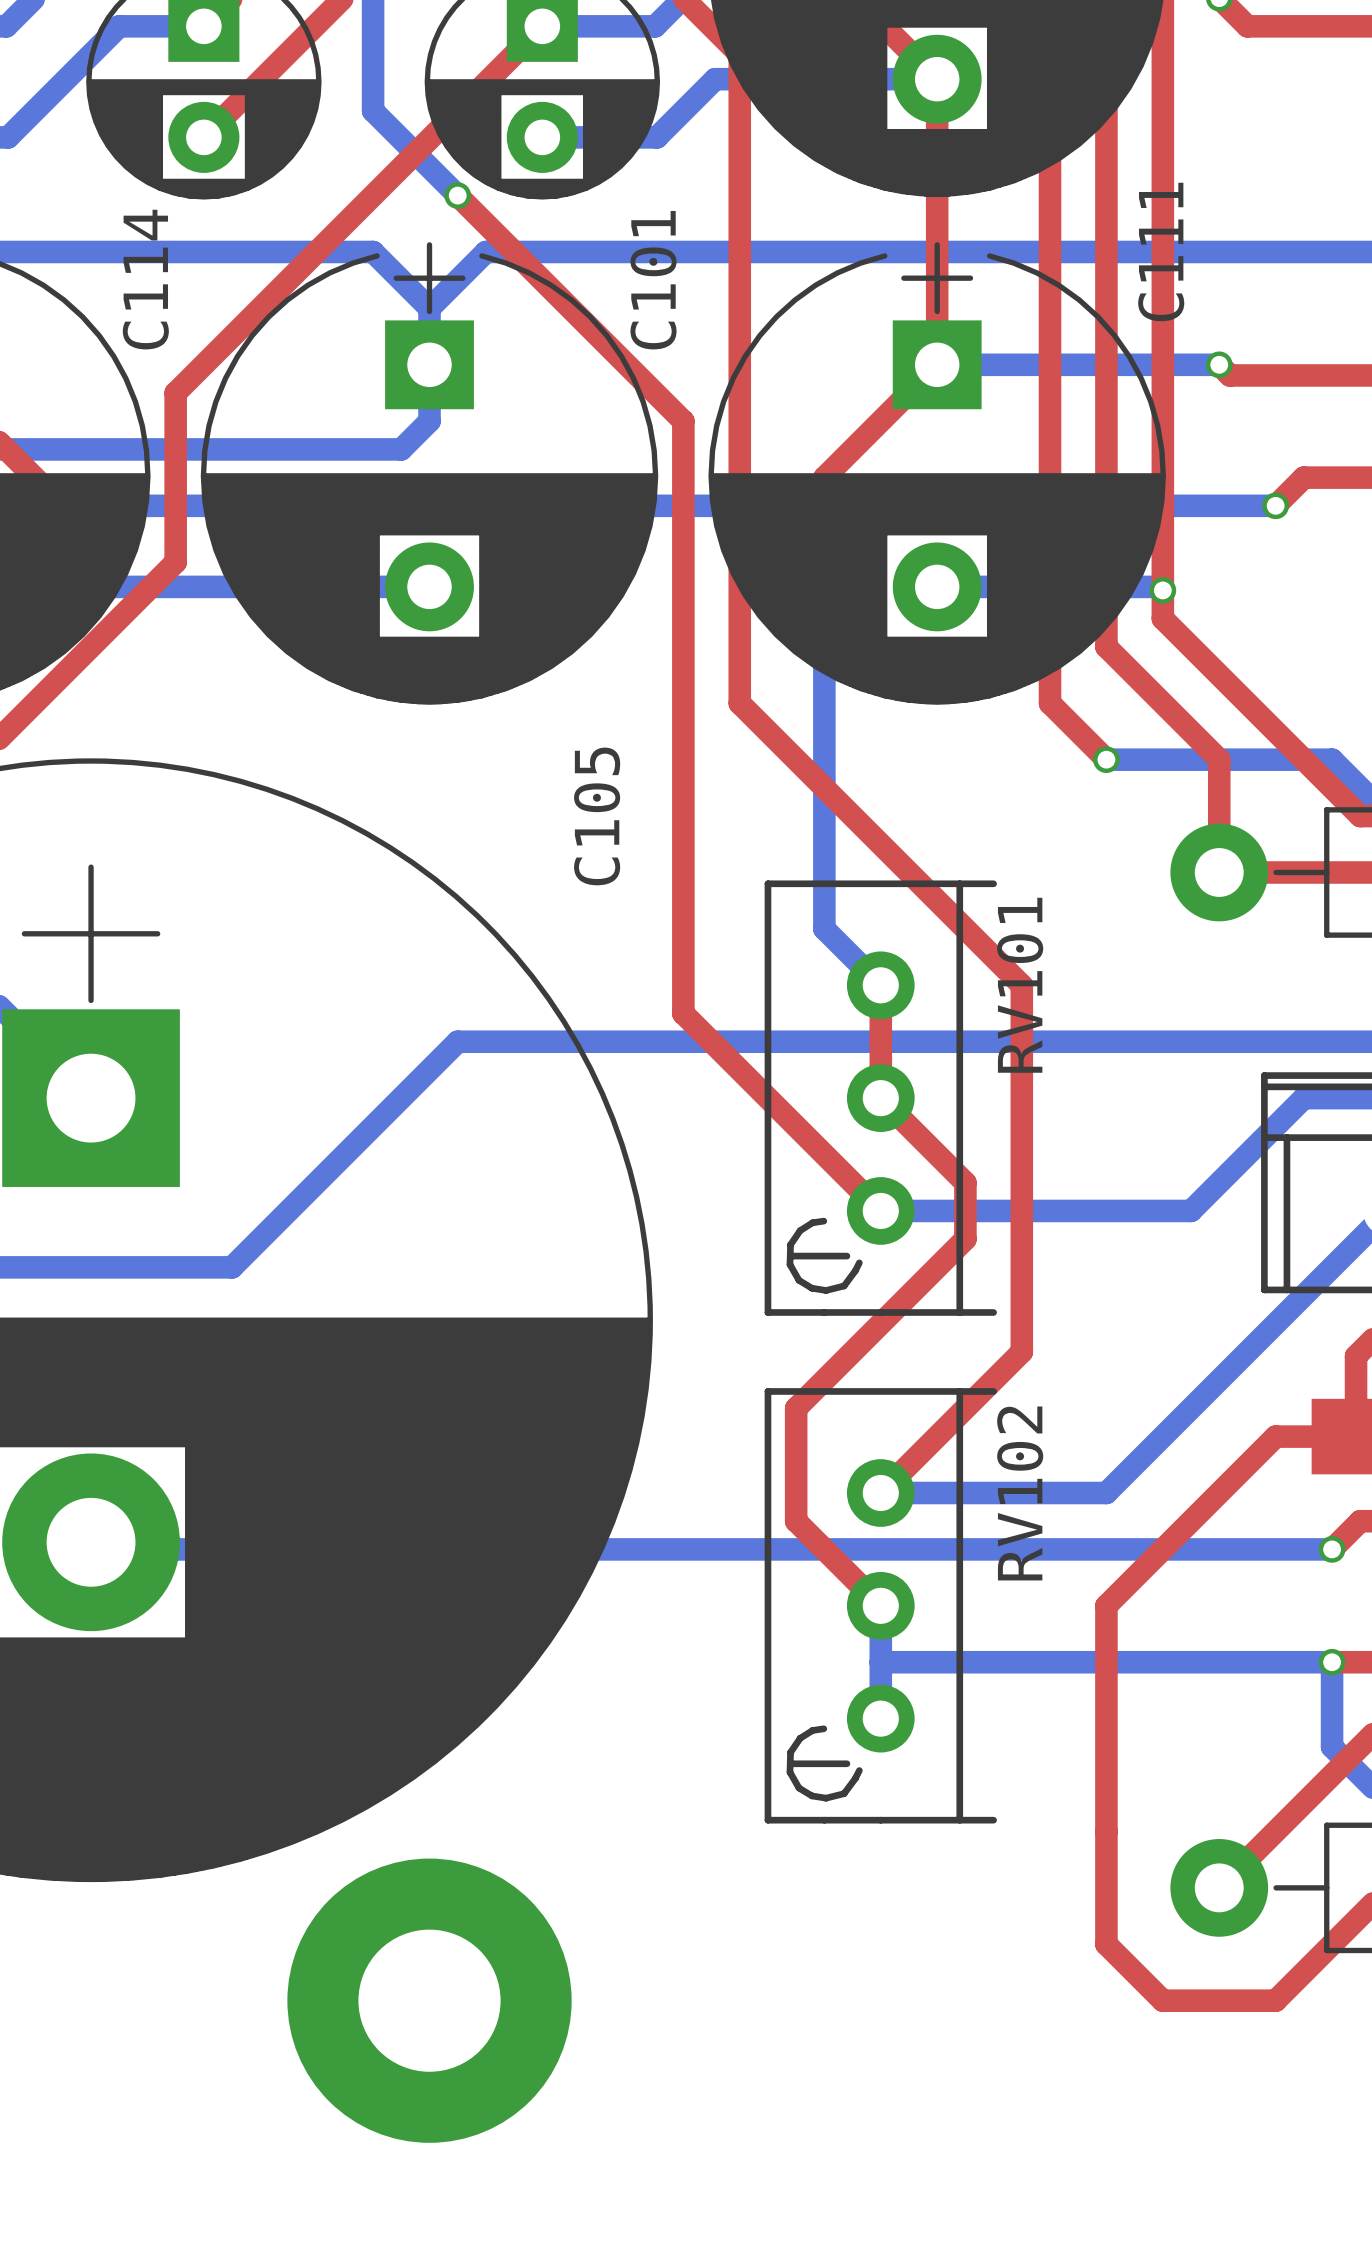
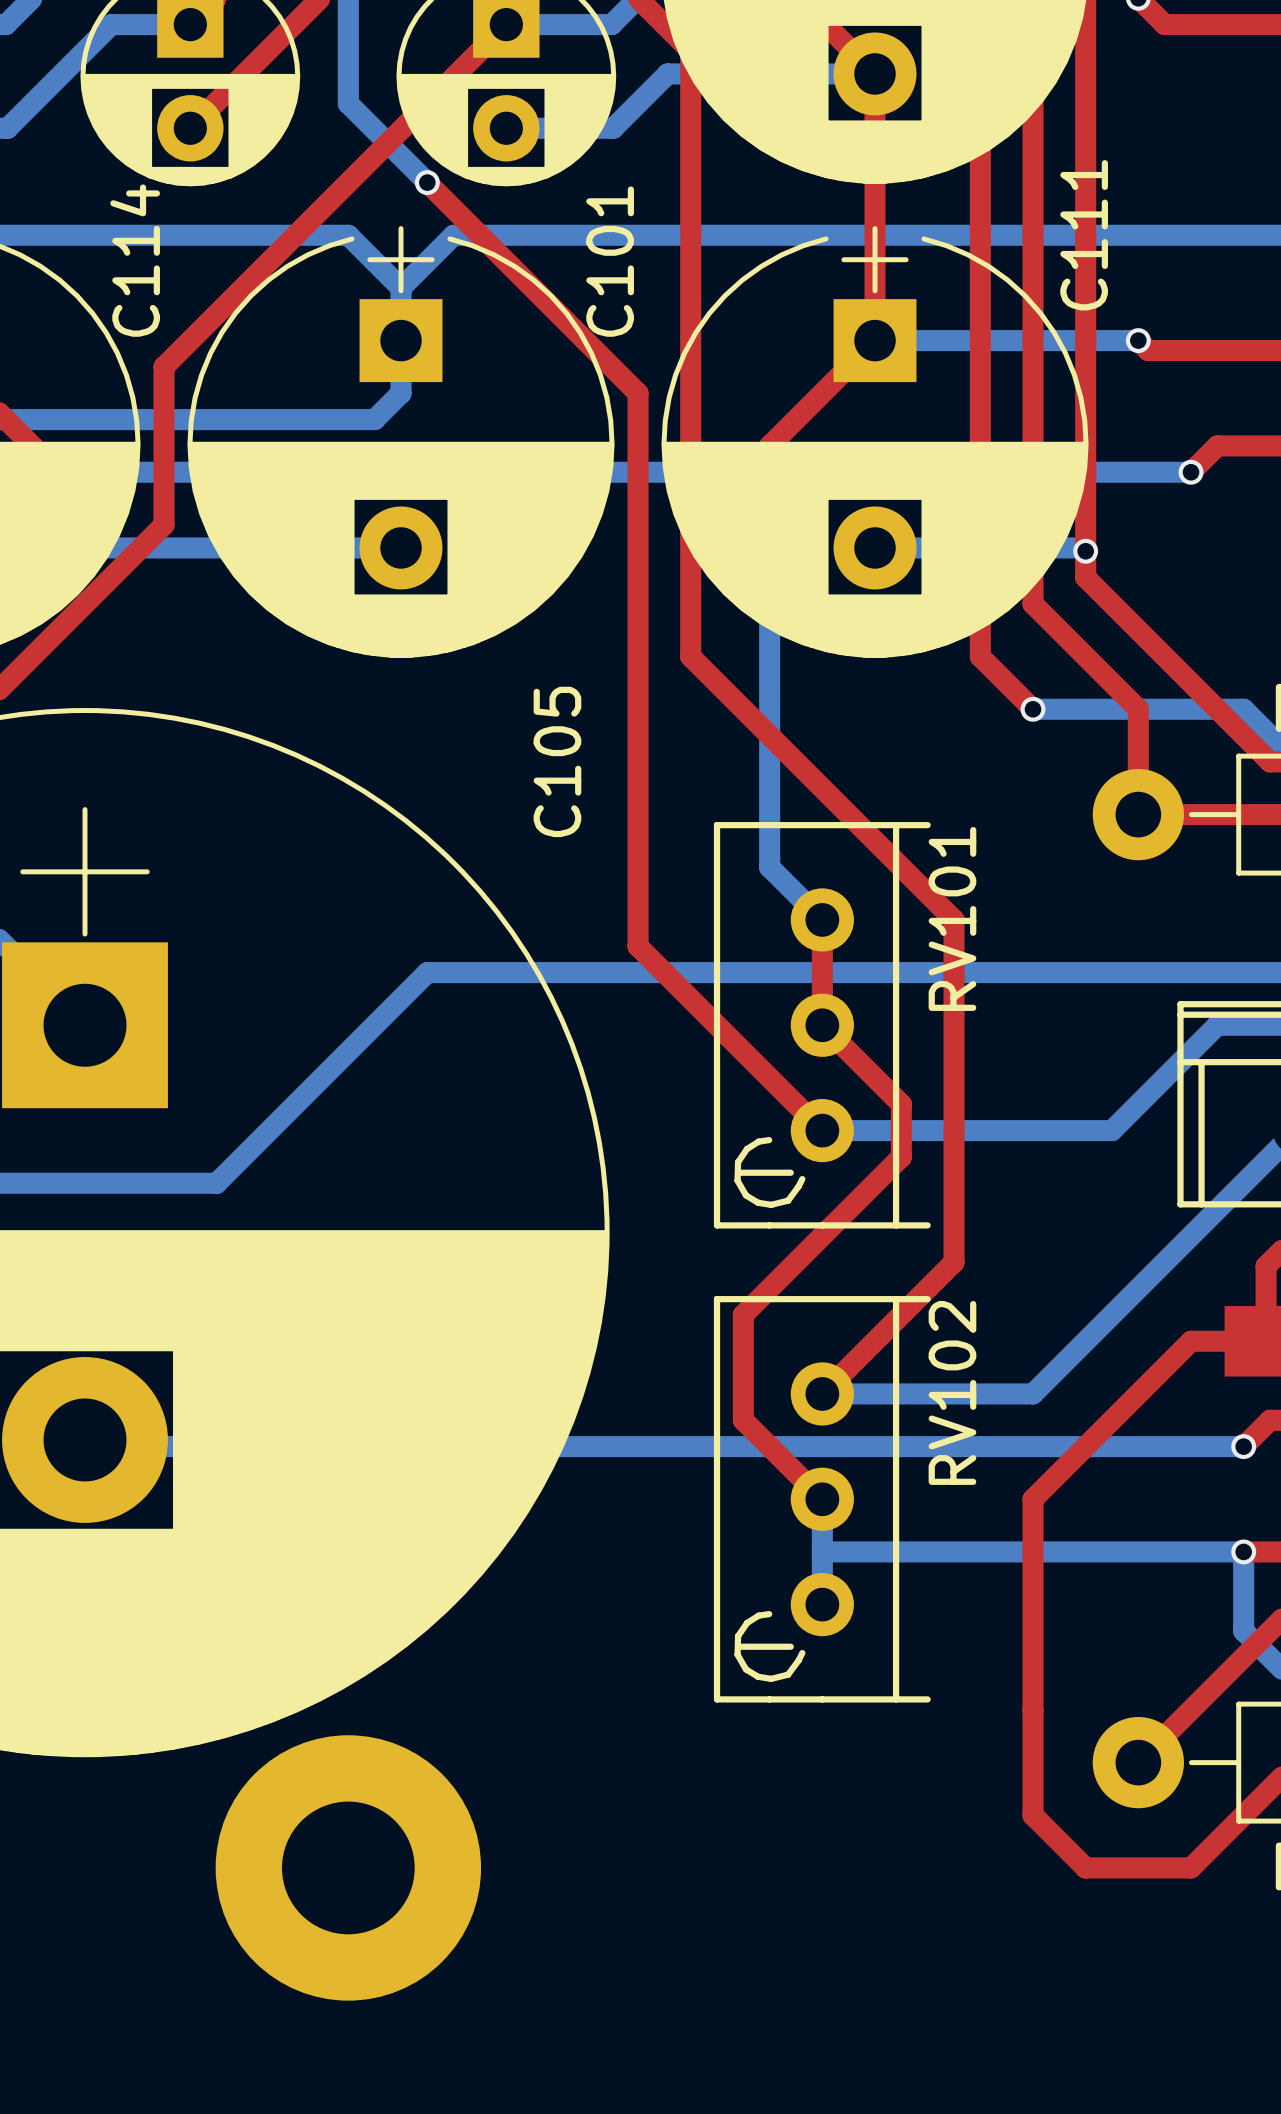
part position: (429, 2000) -> (348, 1867)

